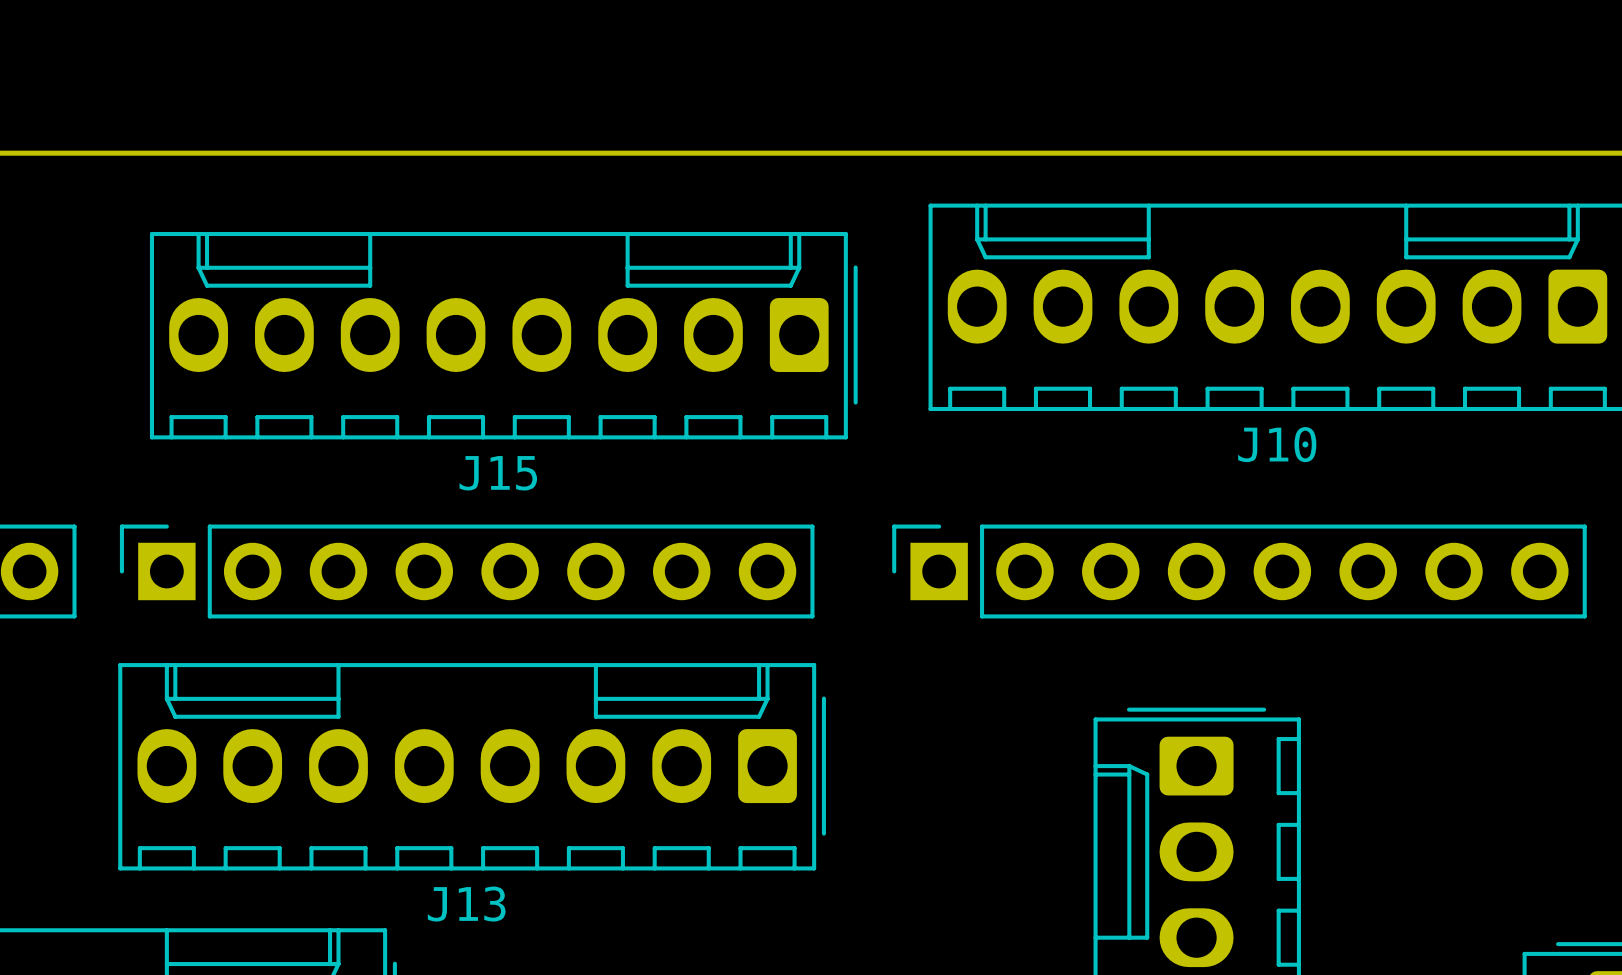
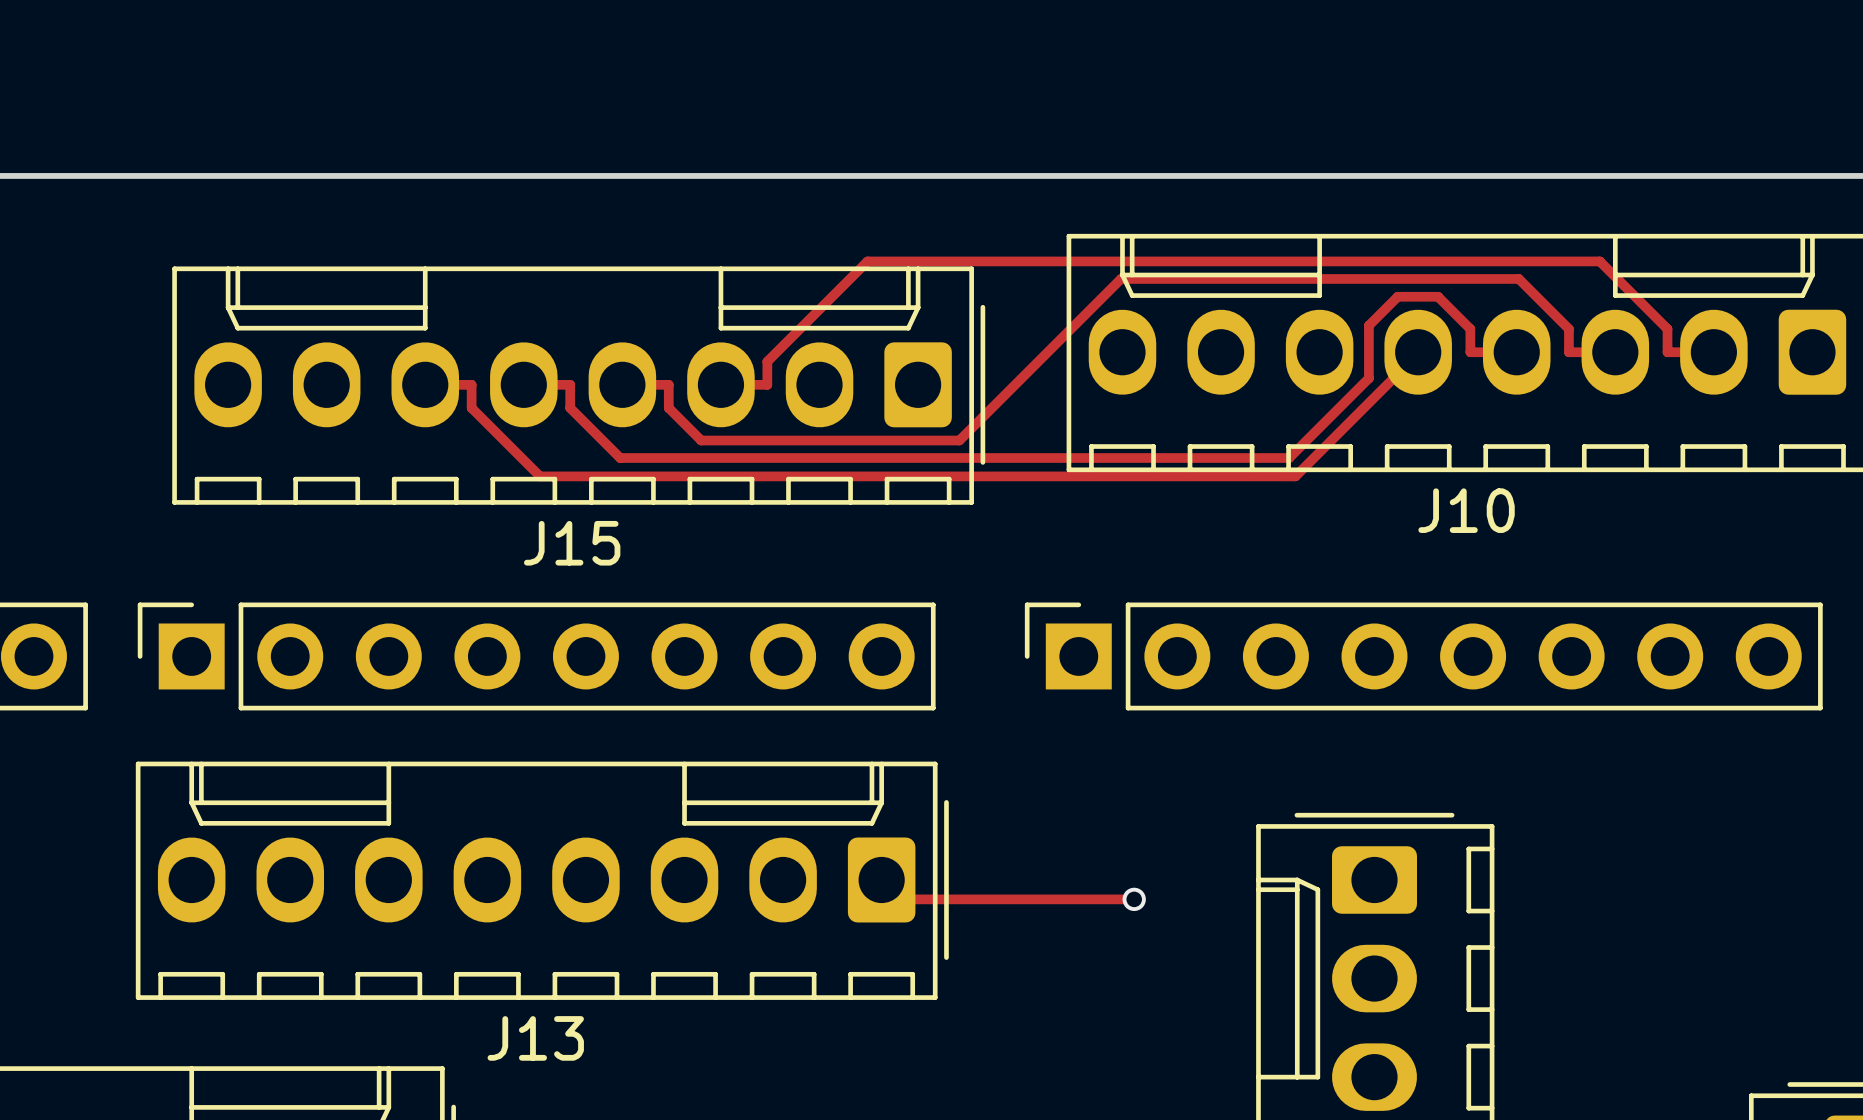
track: none -> (1418, 352) (1295, 476) (540, 476) (471, 408) (471, 384) (425, 384)
track: none -> (1516, 352) (1470, 352) (1470, 329) (1438, 296) (1397, 296) (1368, 325) (1368, 378) (1289, 457) (620, 457) (570, 408) (570, 384) (523, 384)
track: none -> (1615, 352) (1568, 352) (1568, 329) (1518, 278) (1120, 278) (959, 440) (701, 440) (668, 408) (668, 384) (622, 384)
track: none -> (1713, 352) (1667, 352) (1667, 329) (1599, 261) (867, 261) (767, 361) (767, 384) (720, 384)
track: none -> (881, 879) (901, 899) (1134, 899)
via: none -> (1134, 899)

